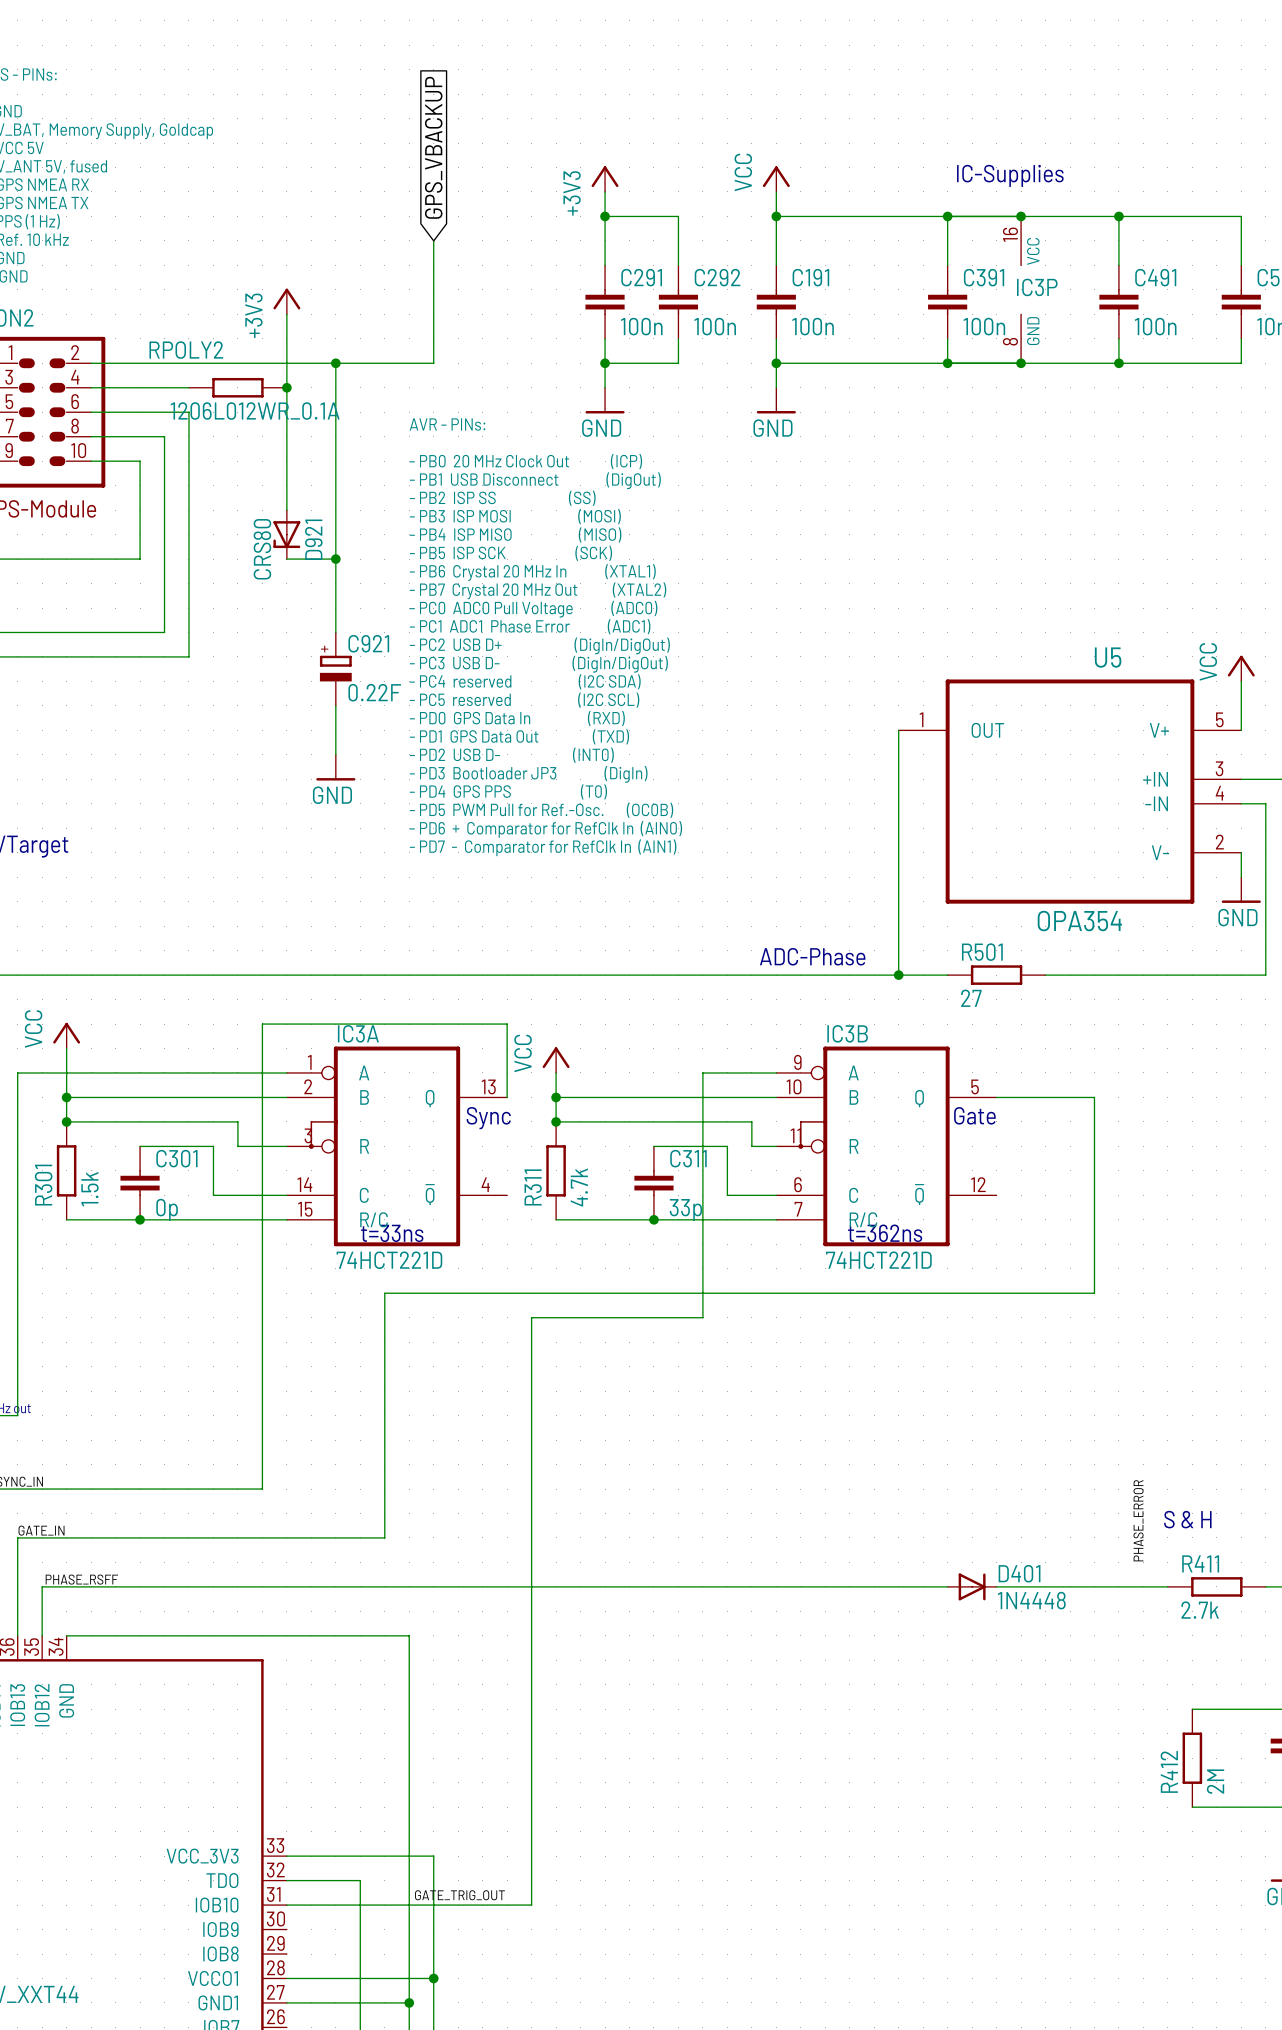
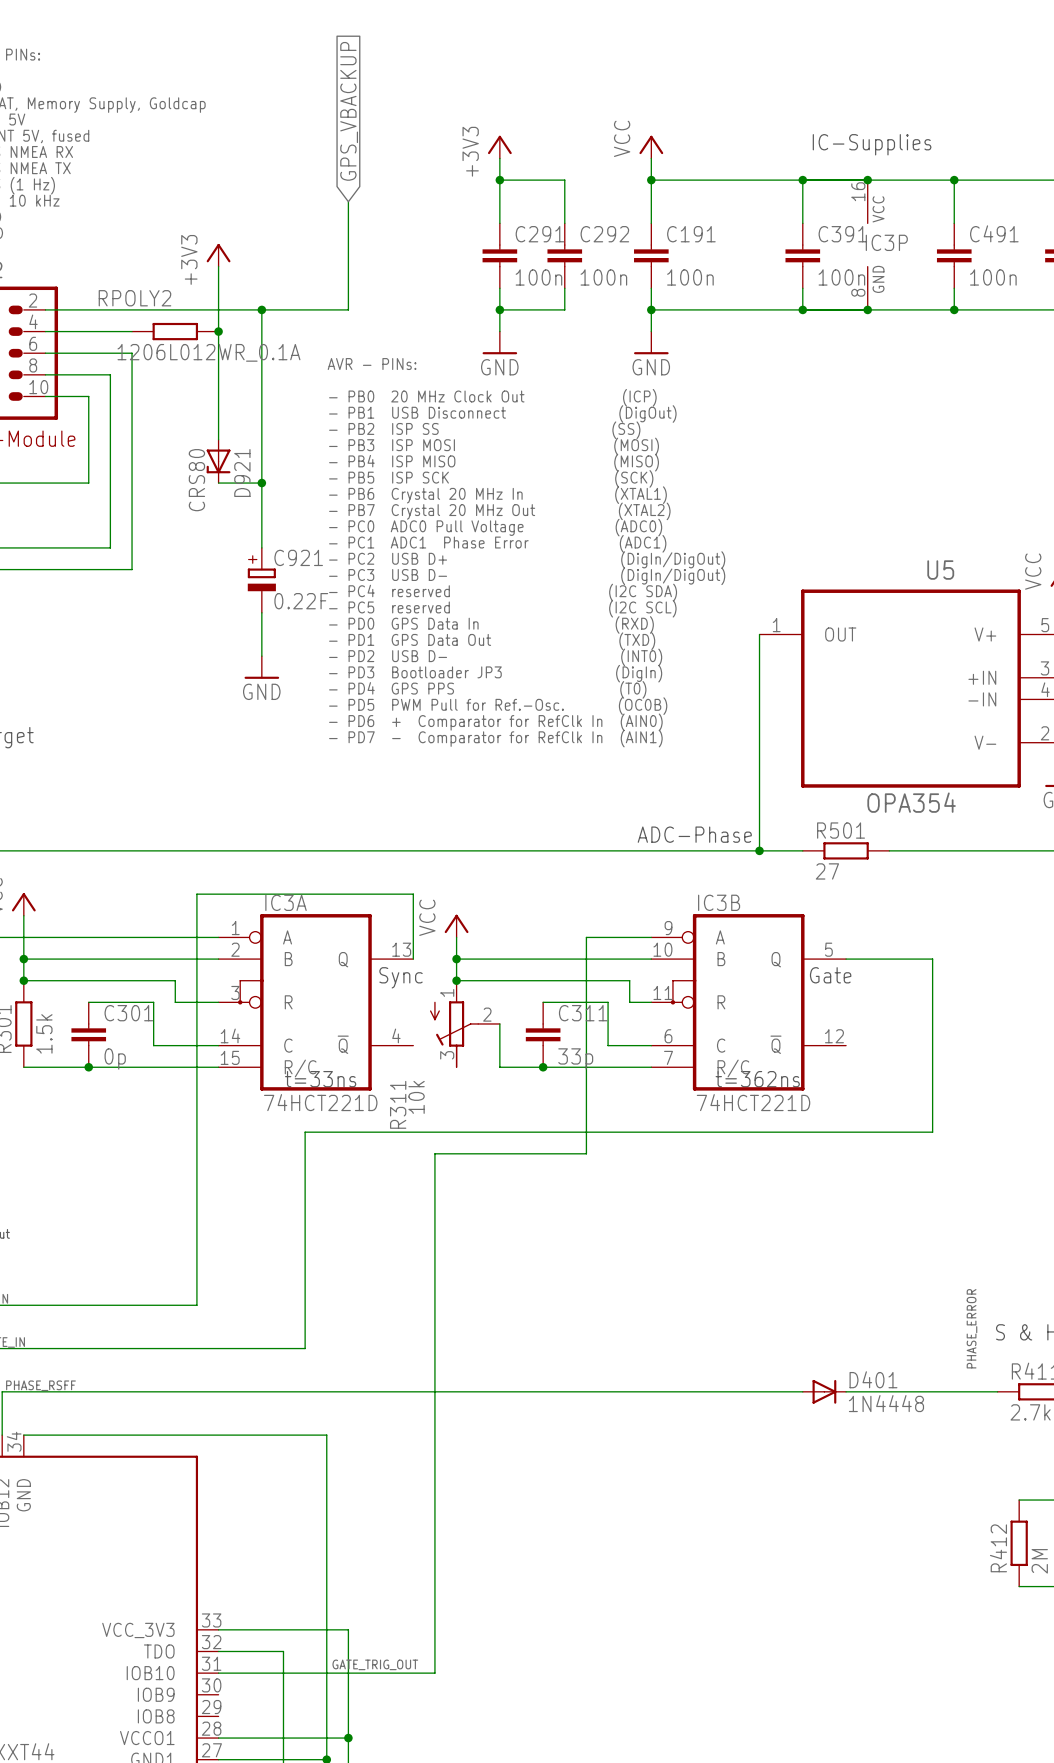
R311 symbol: [546, 1121, 566, 1220] -> [429, 980, 500, 1068]
R311 name position: R311 (533, 1187) -> R311 (398, 1104)
R311 value: 4.7k (579, 1187) -> 10k (416, 1097)
wire: (556, 1219) (605, 1219) -> (499, 1023) (499, 1067)

